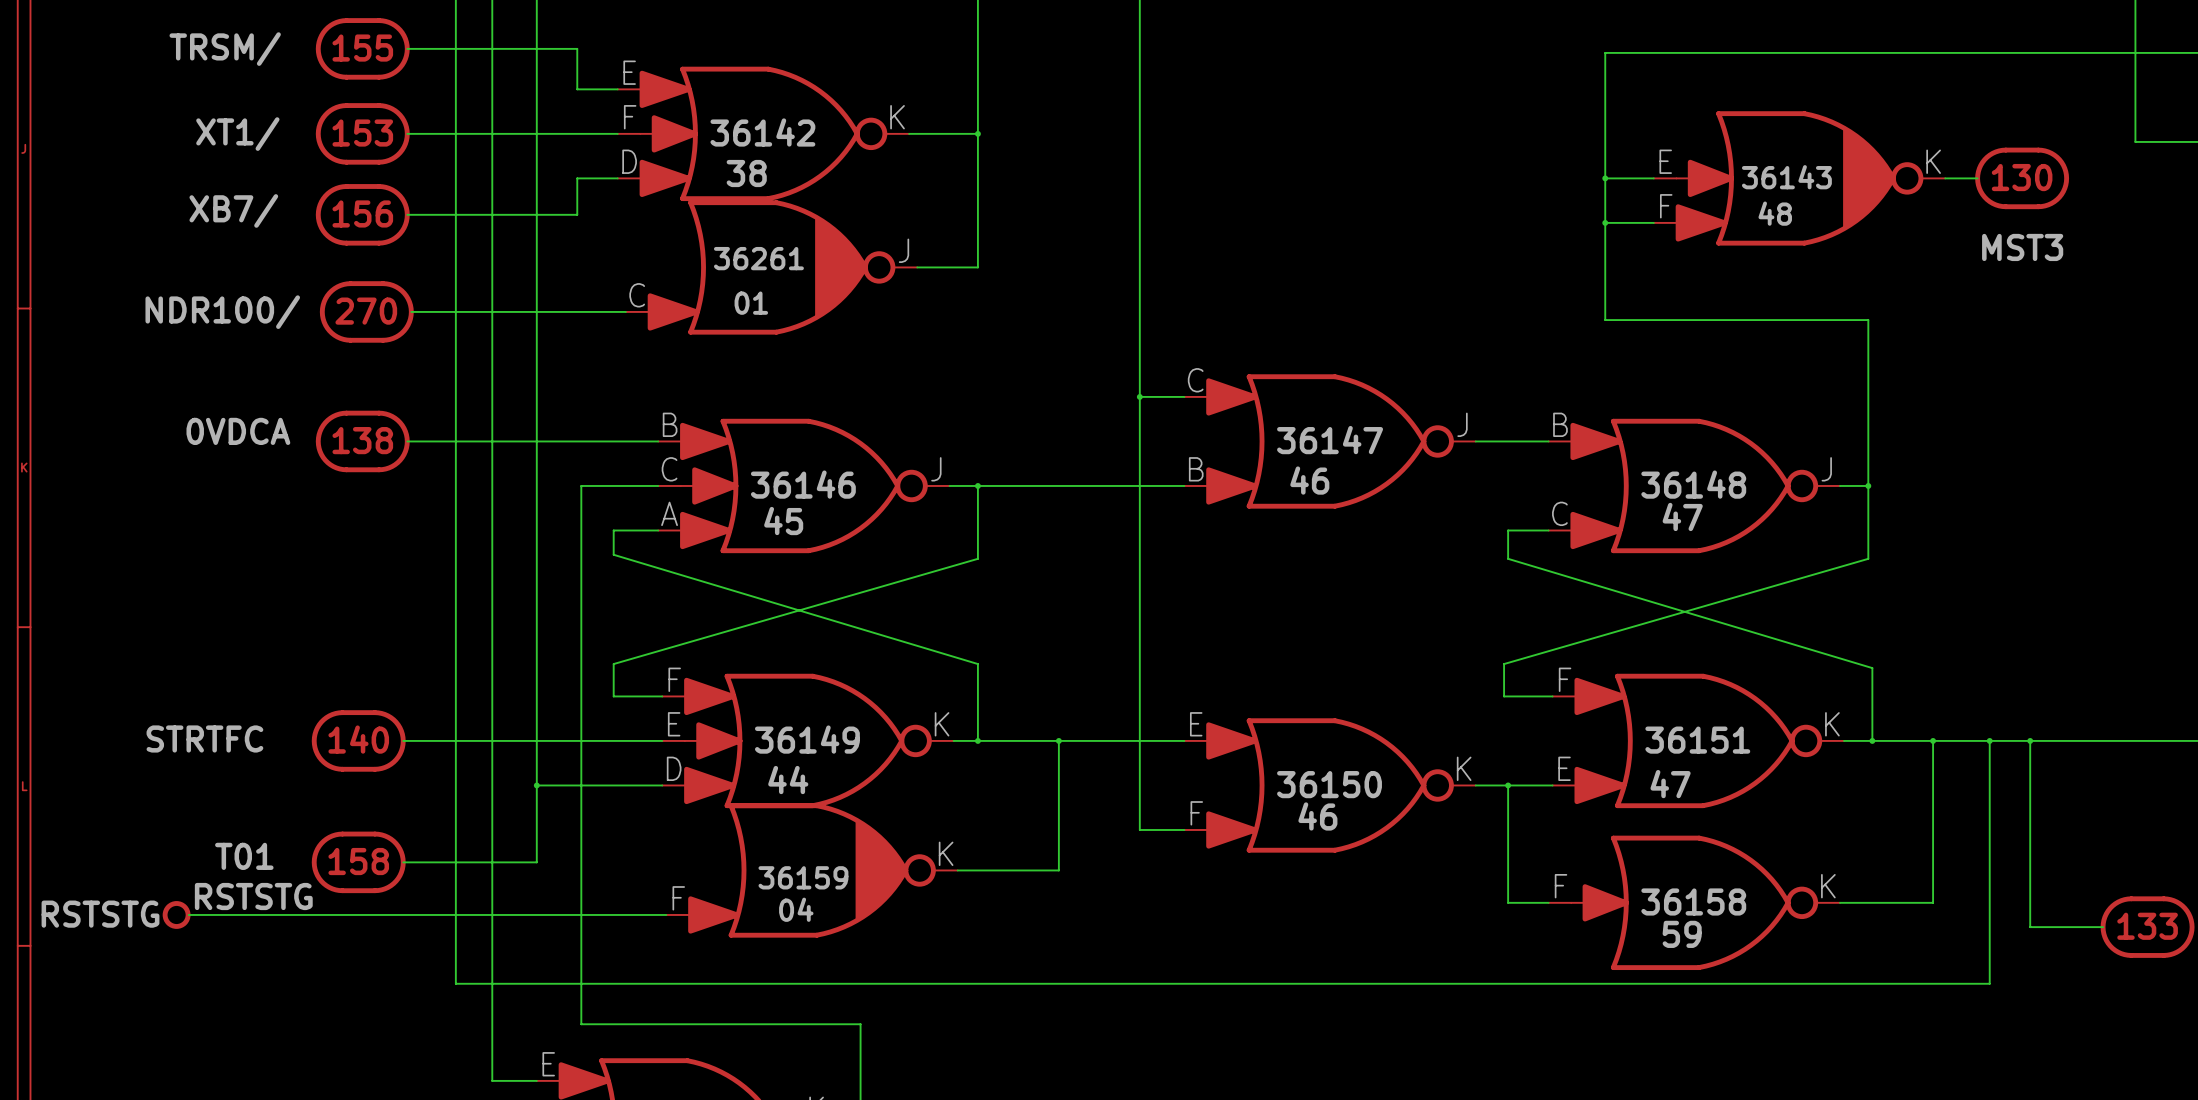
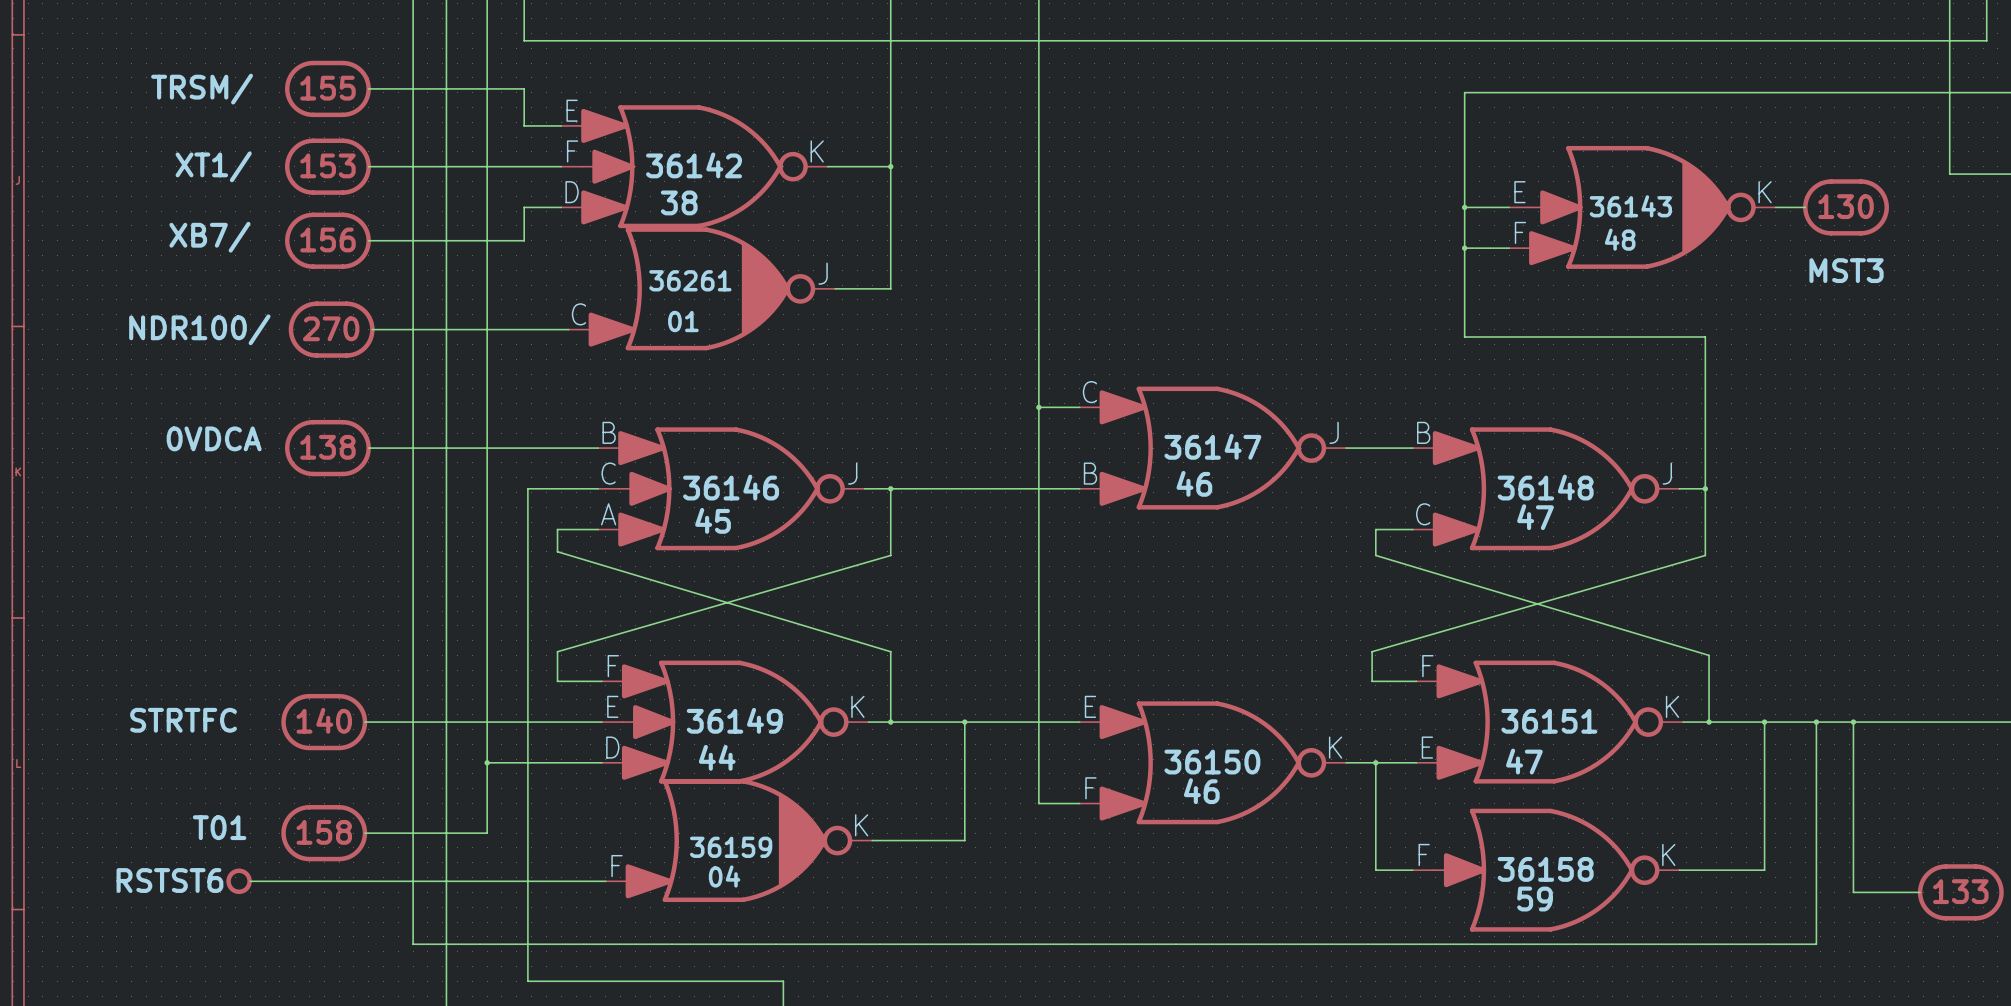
label: RSTSTG (253, 896) -> none
part: (176, 914) -> none
wire: (188, 914) (277, 914) -> none
part: none -> (239, 881)

